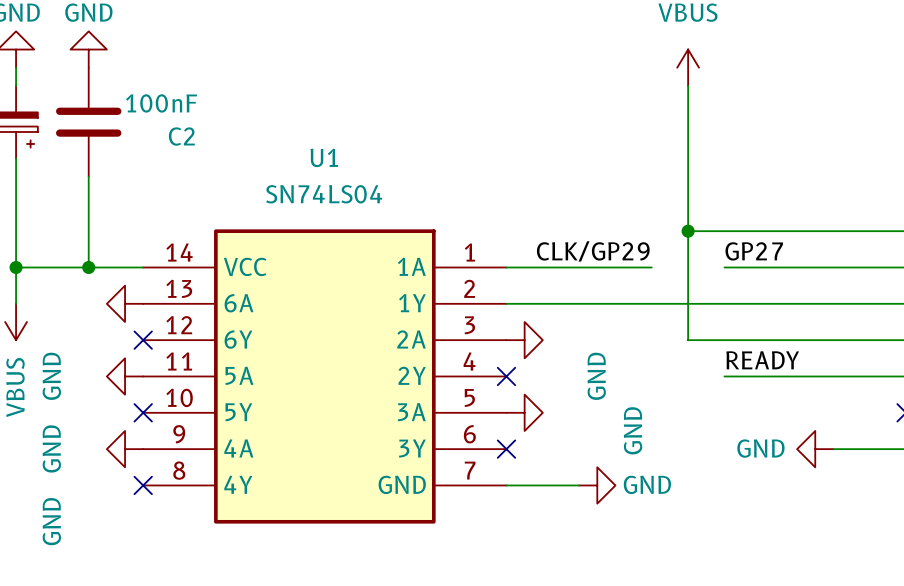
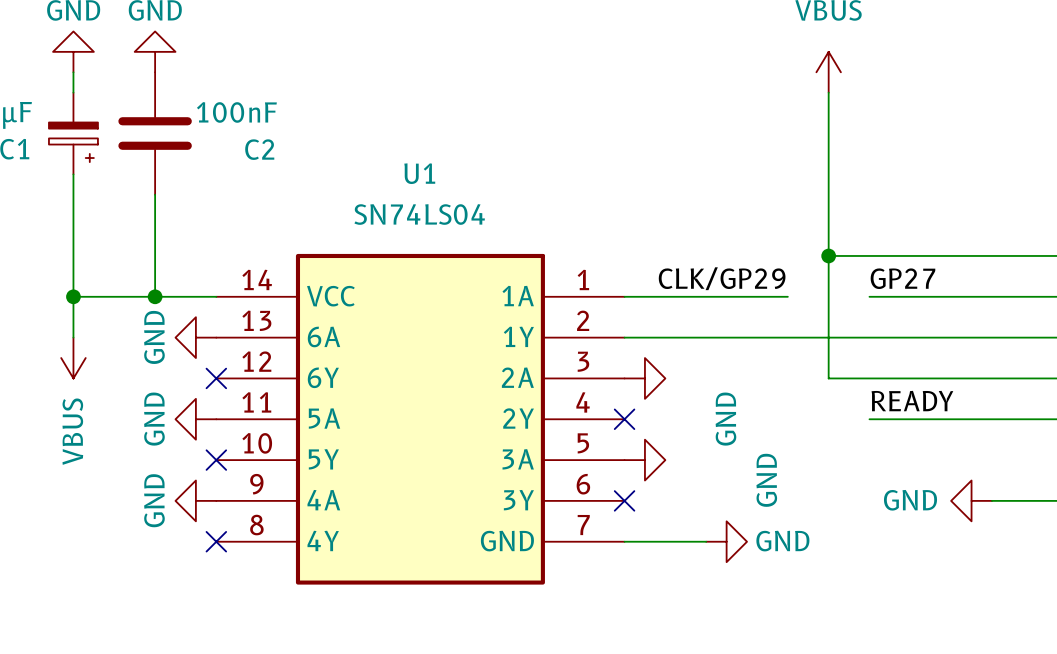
power symbol text position: GND (51, 376) -> GND (154, 337)
power symbol text position: GND (51, 448) -> GND (154, 419)
power symbol text position: GND (51, 521) -> GND (154, 500)

